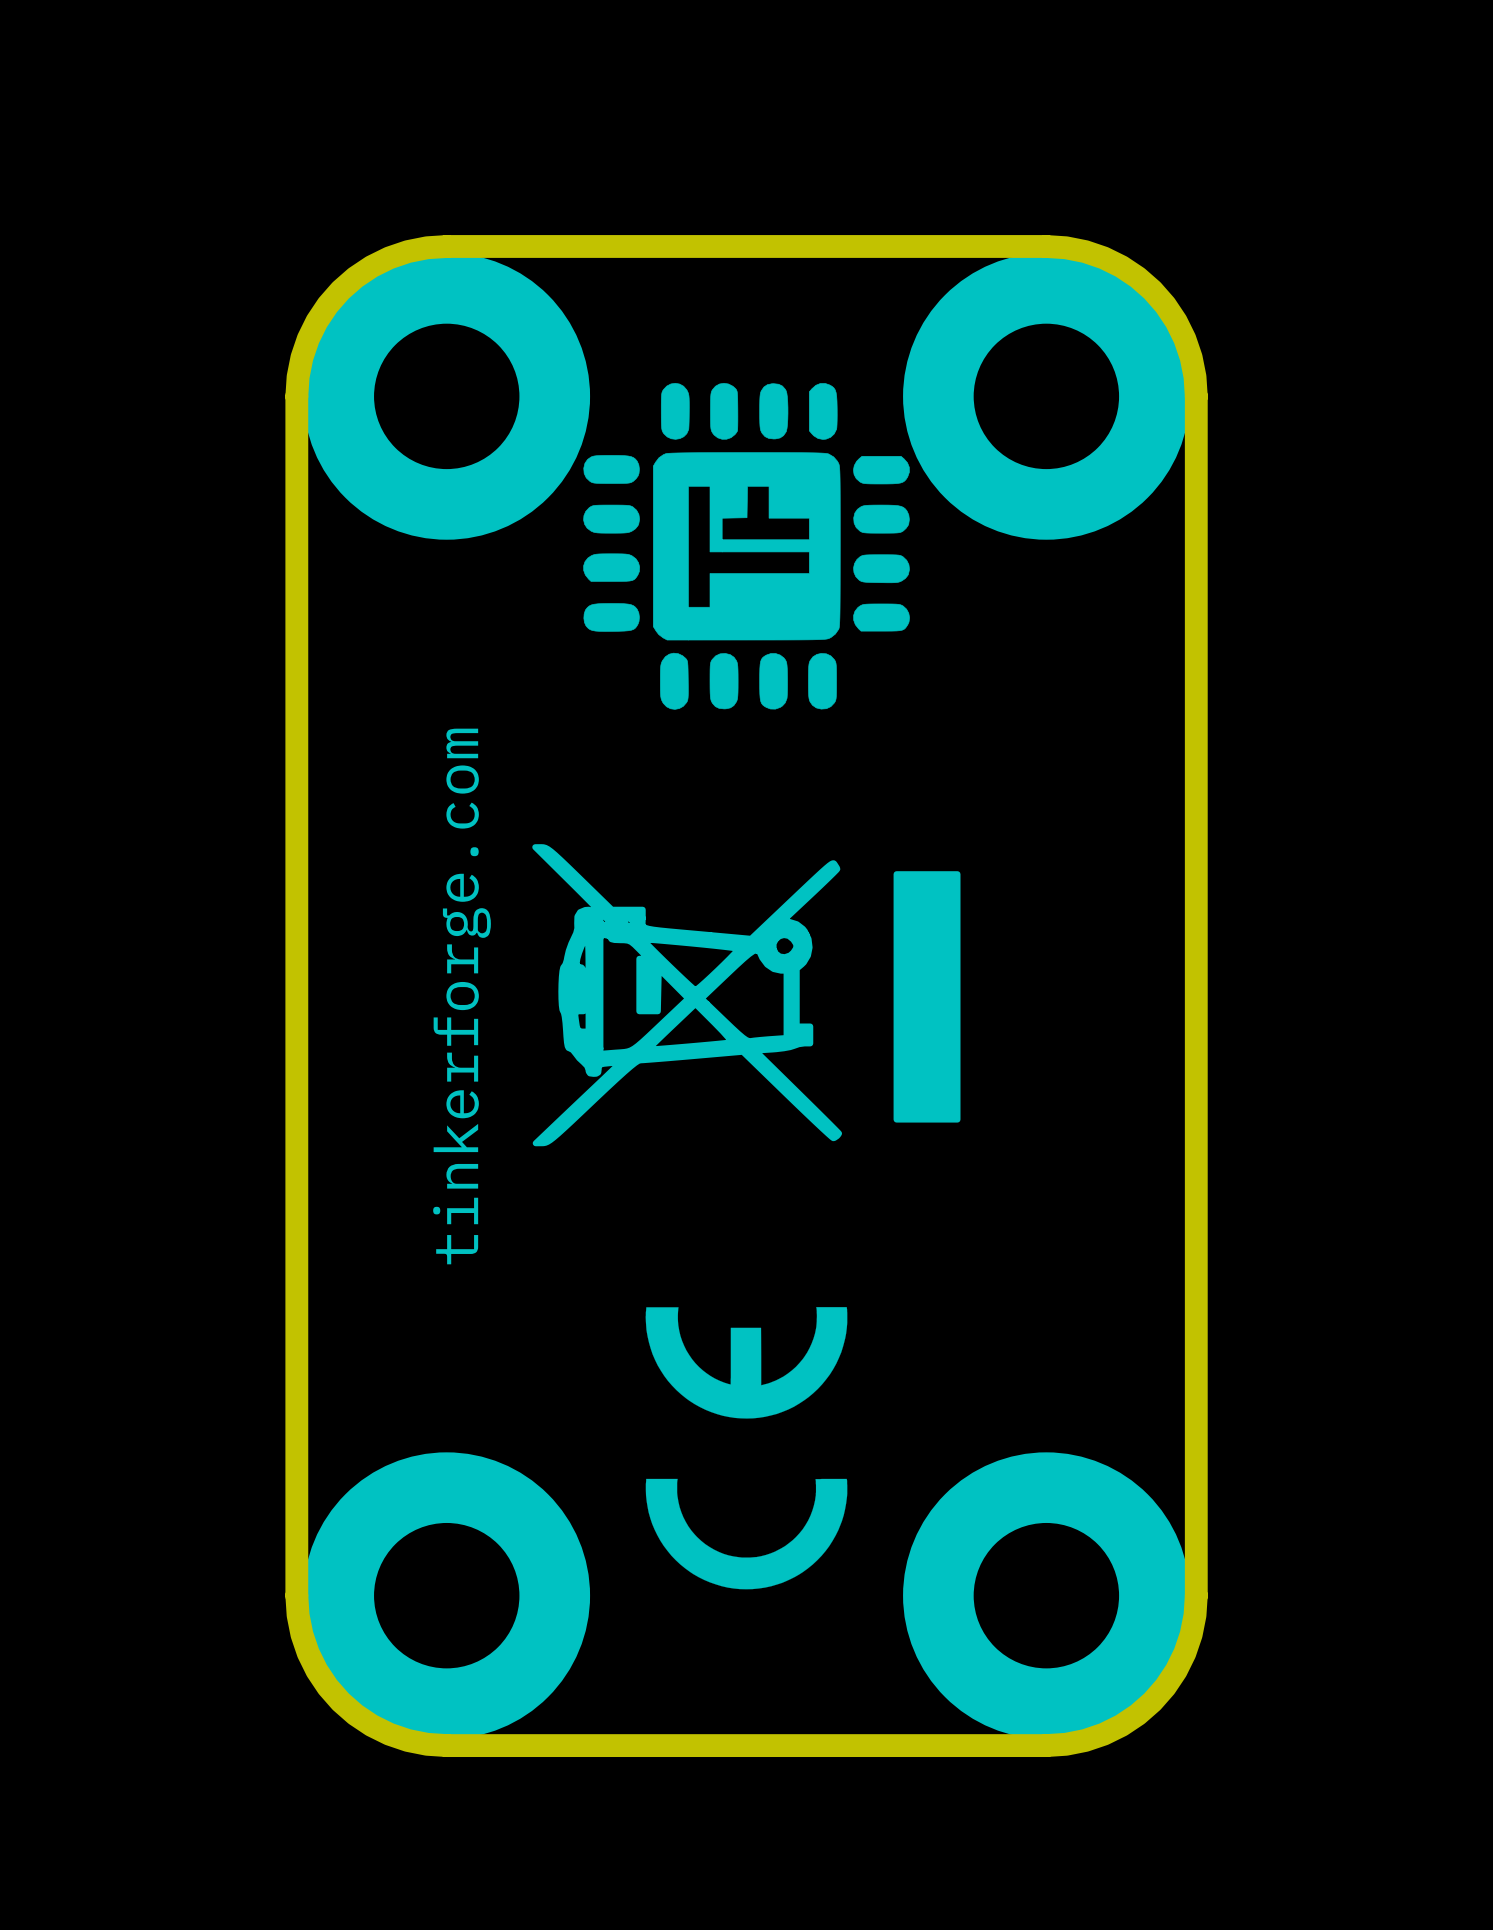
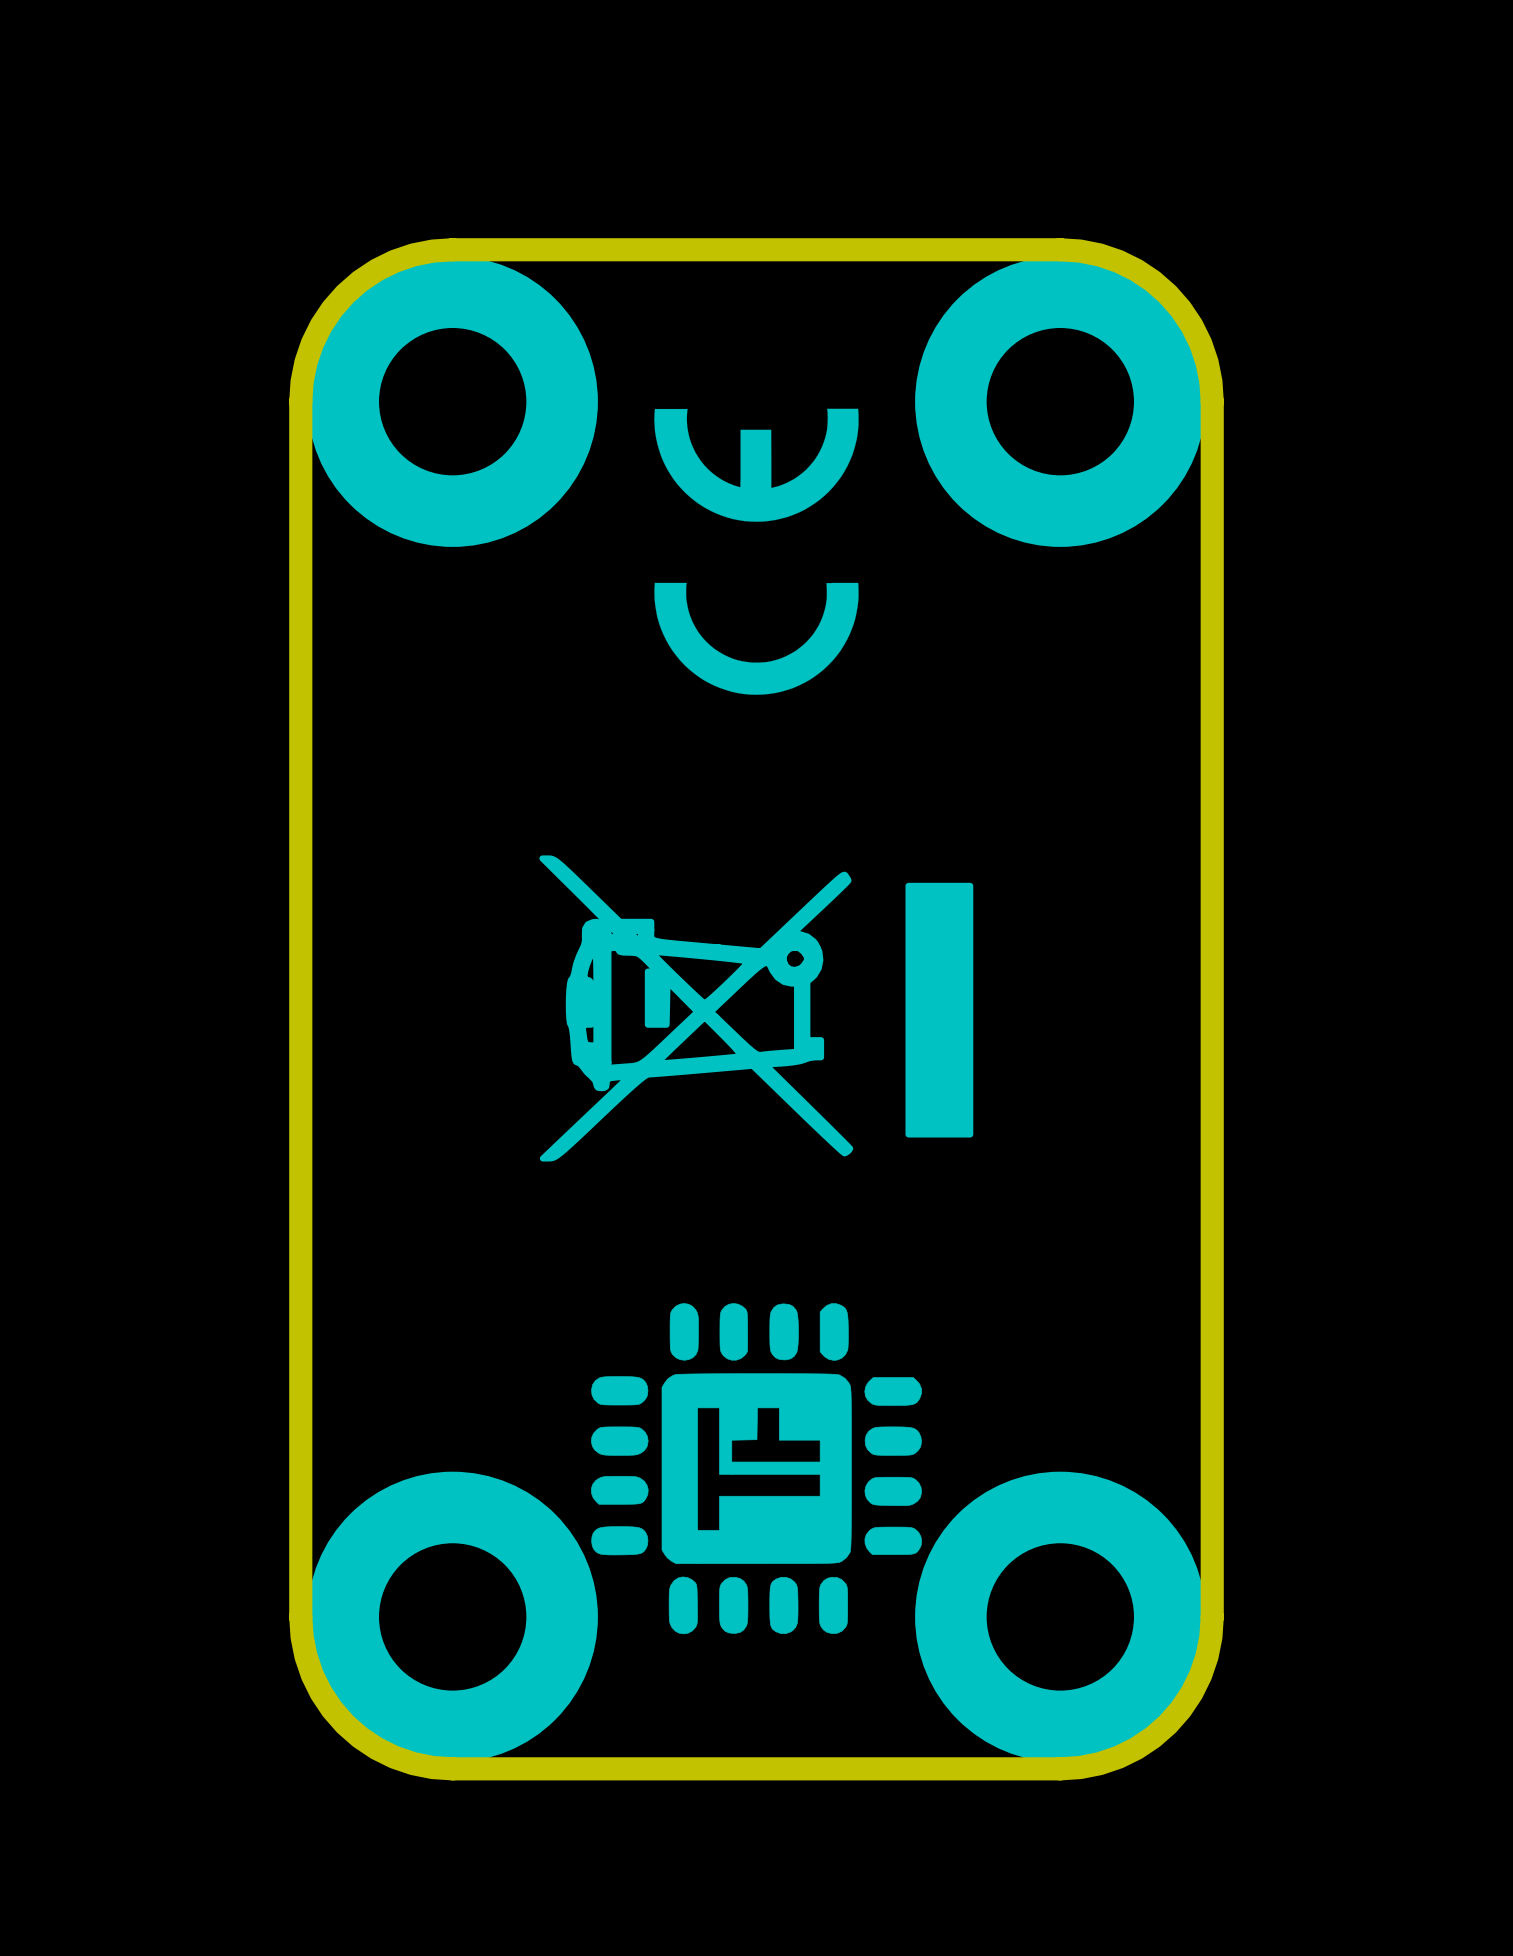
drawing position: (746, 546) -> (756, 1468)
text: tinkerforge.com (462, 996) -> none
drawing position: (746, 1448) -> (756, 551)

